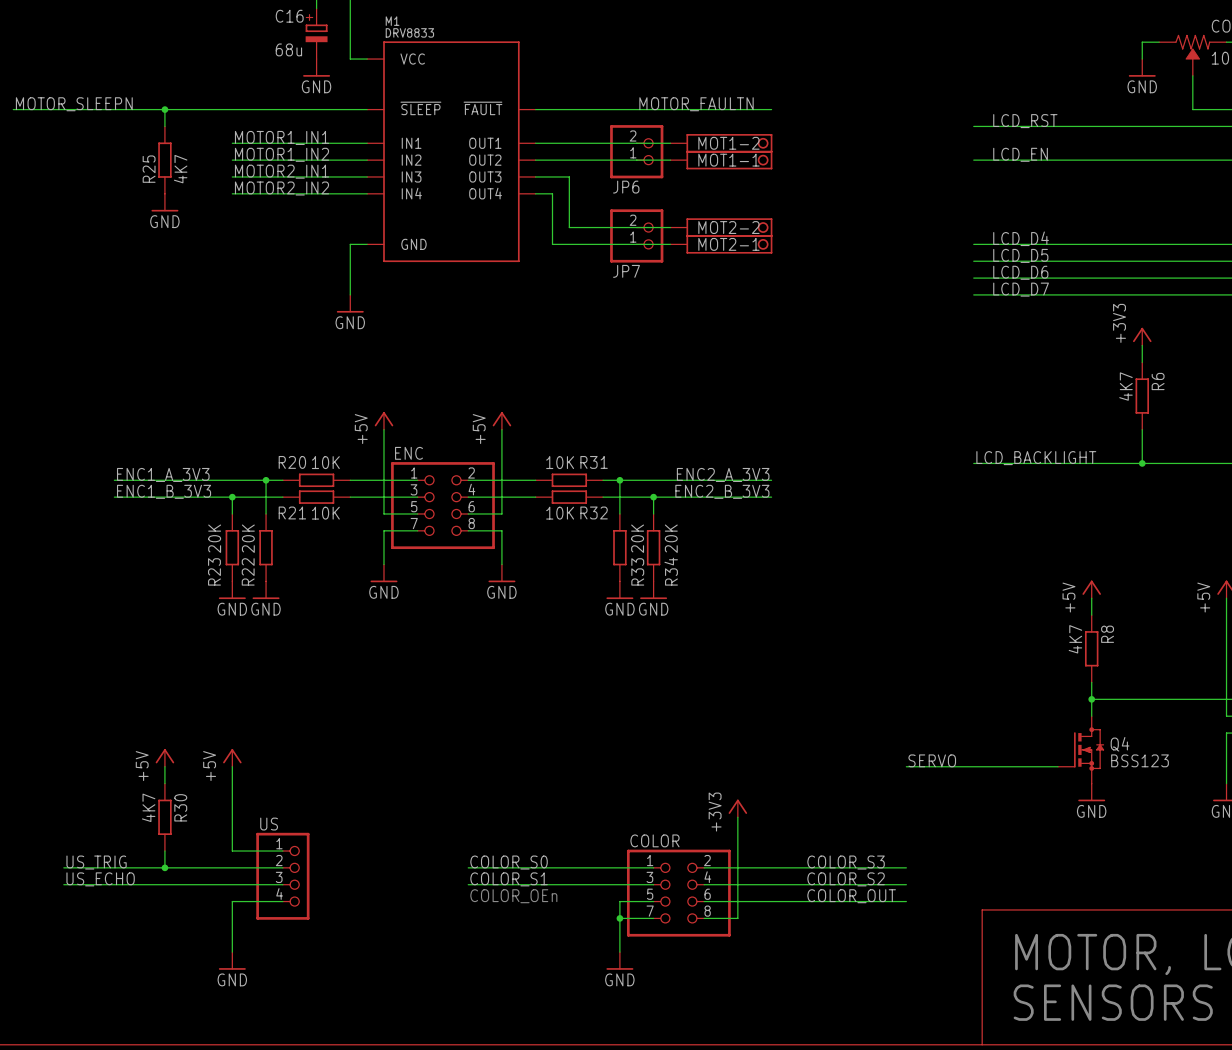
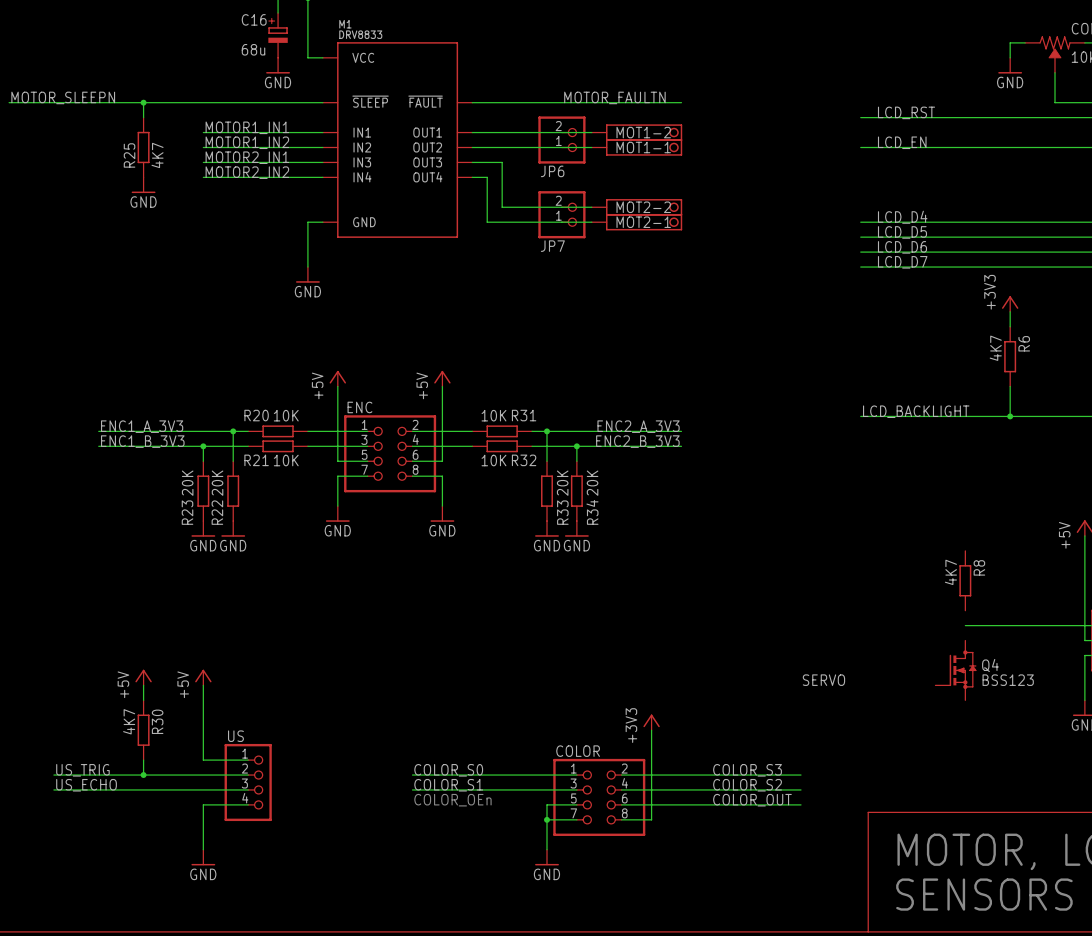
power symbol: +5V (1091, 589) -> none
wire: (1091, 598) (1091, 615) -> none
wire: (1091, 682) (1091, 716) -> none
junction: (1091, 699) -> none
wire: (906, 766) (1058, 766) -> none
power symbol: GND (1091, 792) -> none

